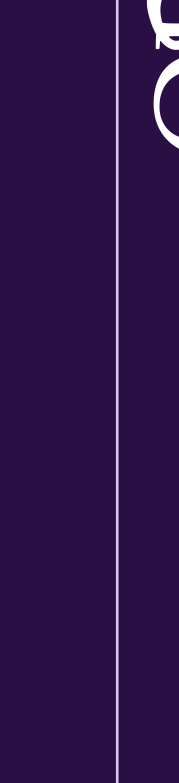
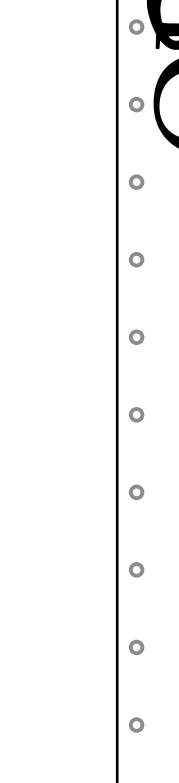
via: none -> (136, 27)
via: none -> (136, 104)
via: none -> (136, 182)
via: none -> (136, 259)
via: none -> (136, 337)
via: none -> (136, 414)
via: none -> (136, 492)
via: none -> (136, 569)
via: none -> (136, 647)
via: none -> (136, 725)

